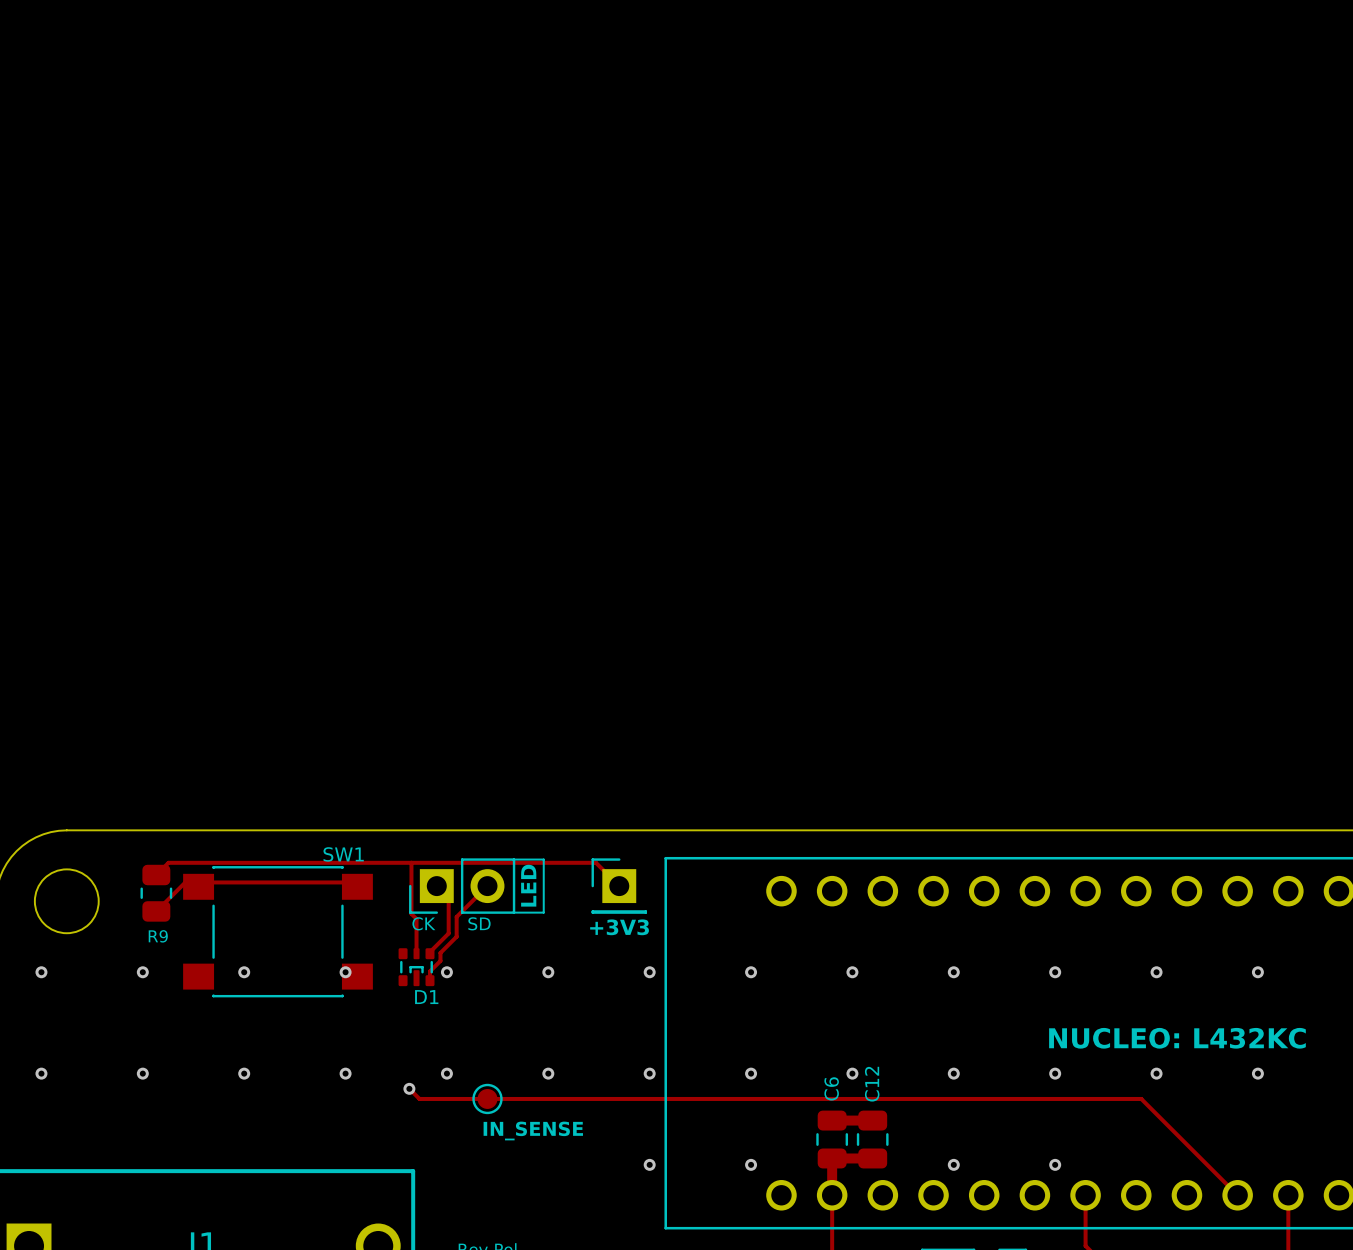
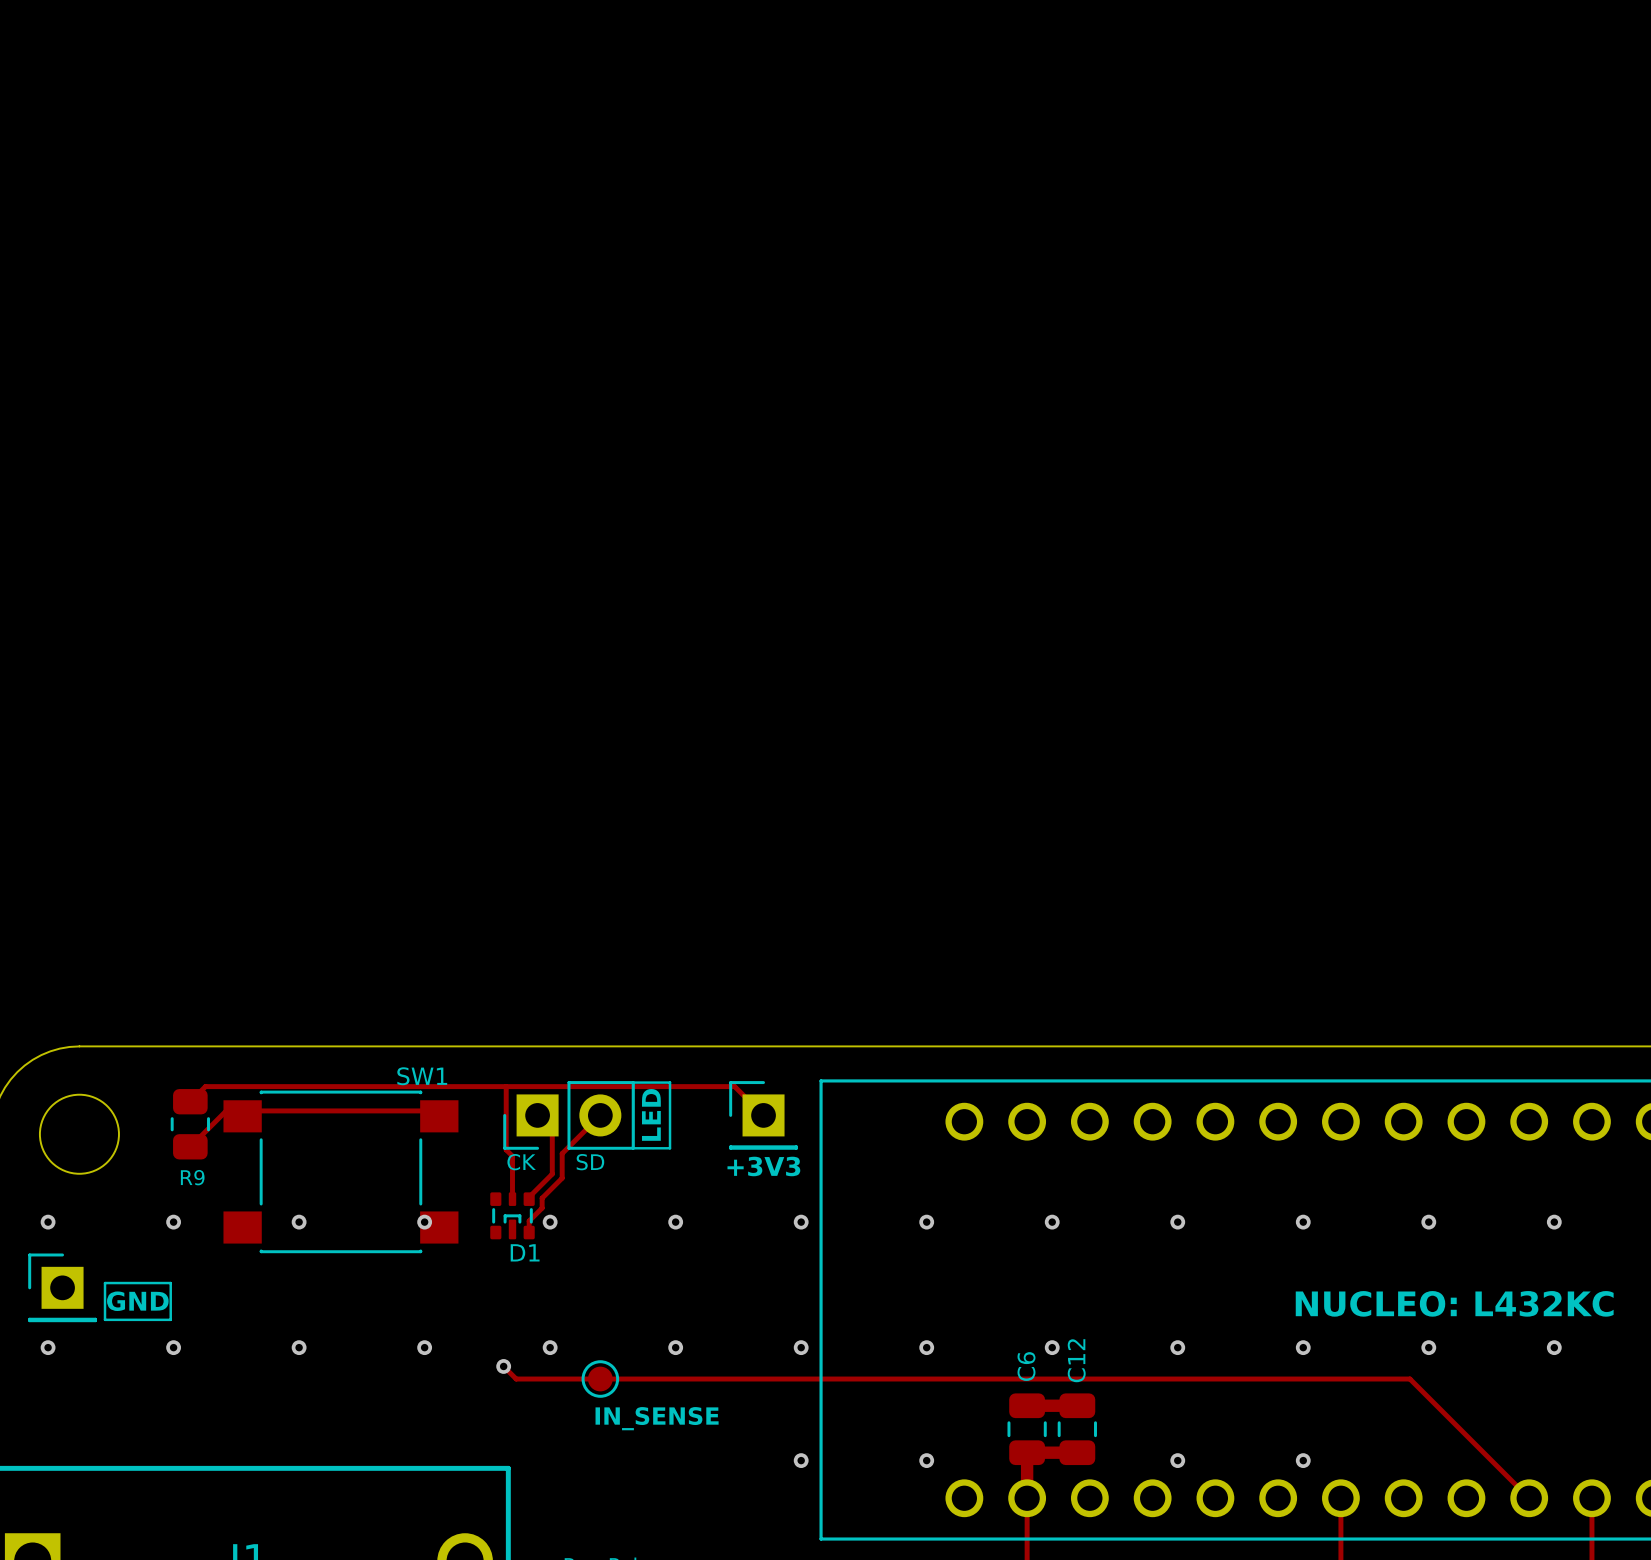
line: none -> (105, 1283) (170, 1283) (170, 1319) (105, 1319) (105, 1283)
part: none -> (62, 1287)
text: none -> GND (137, 1301)

